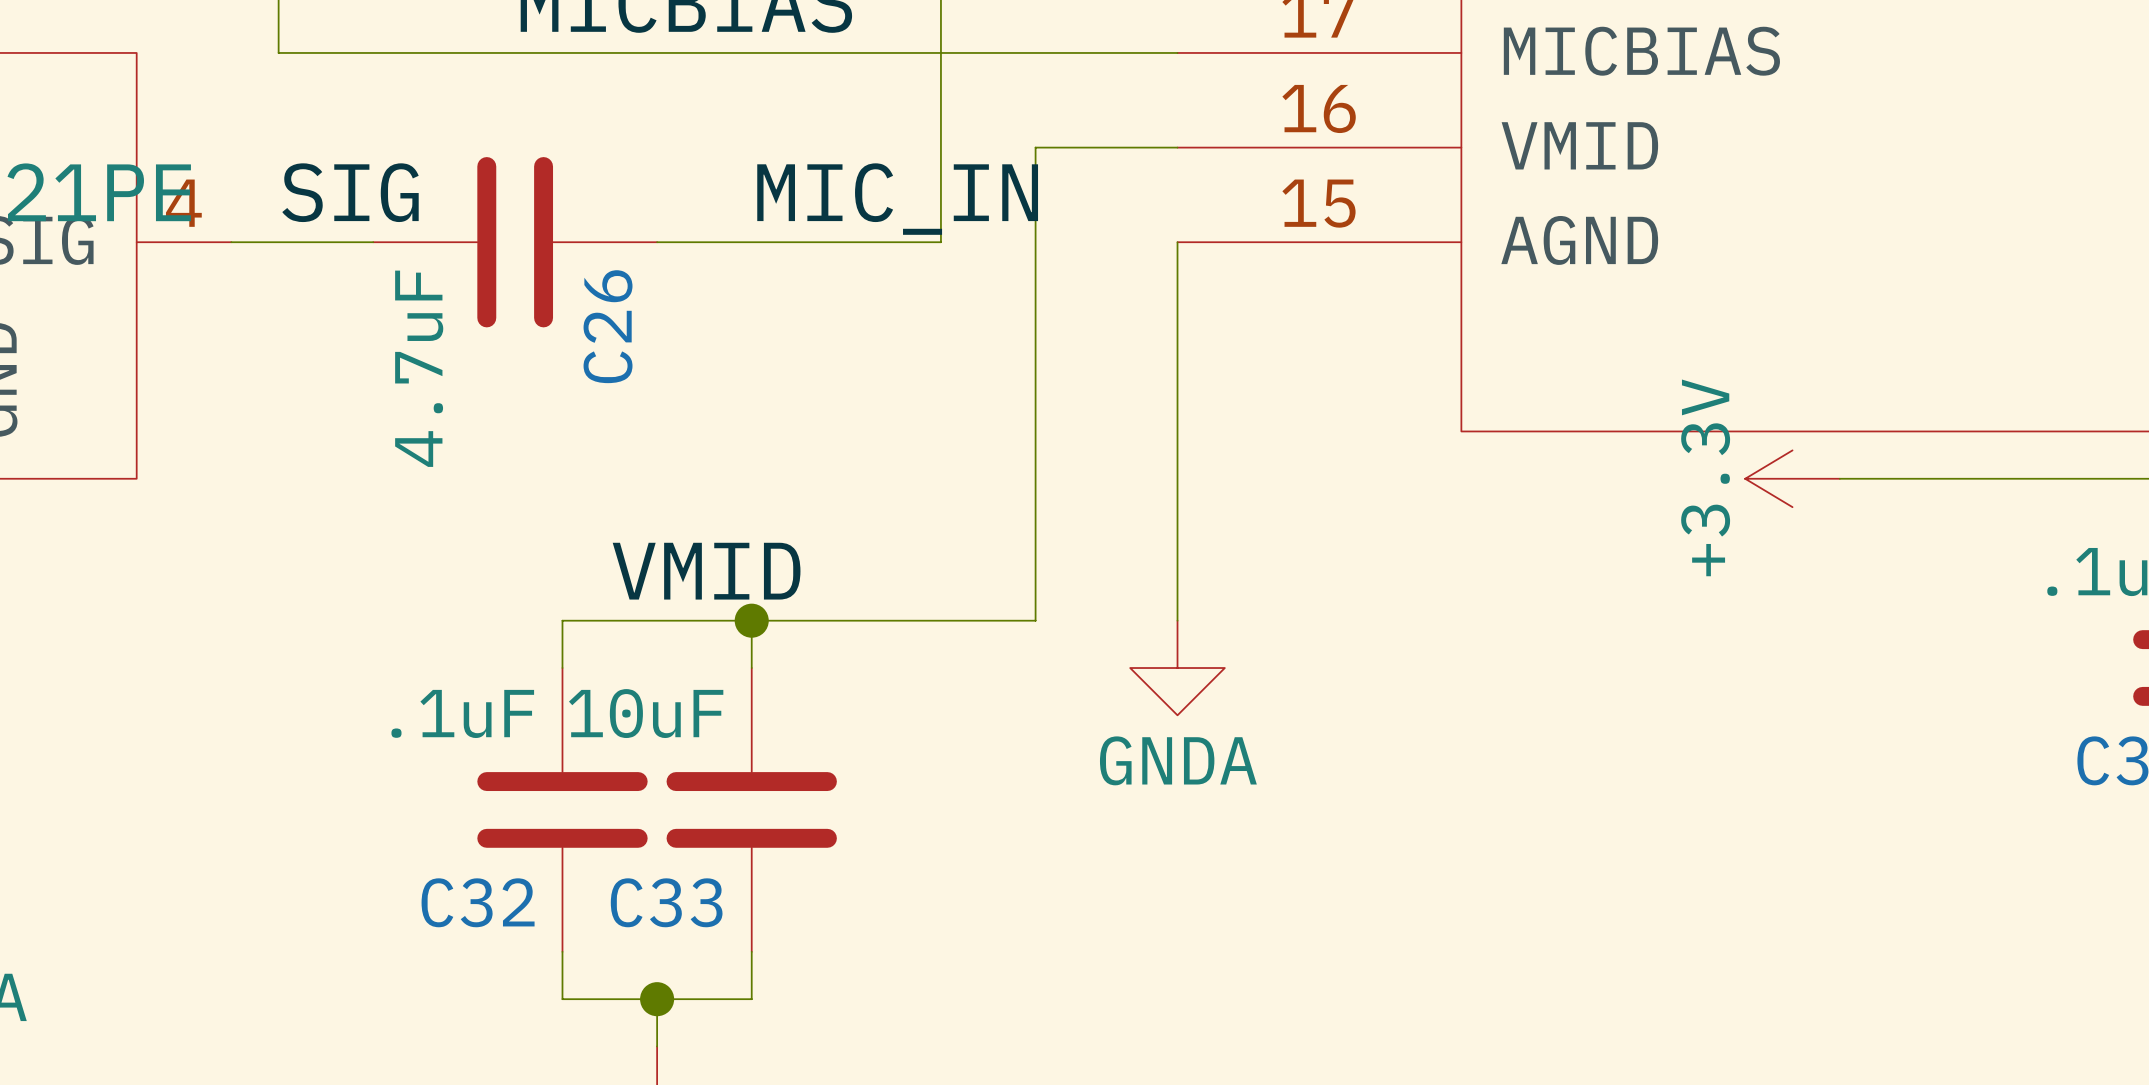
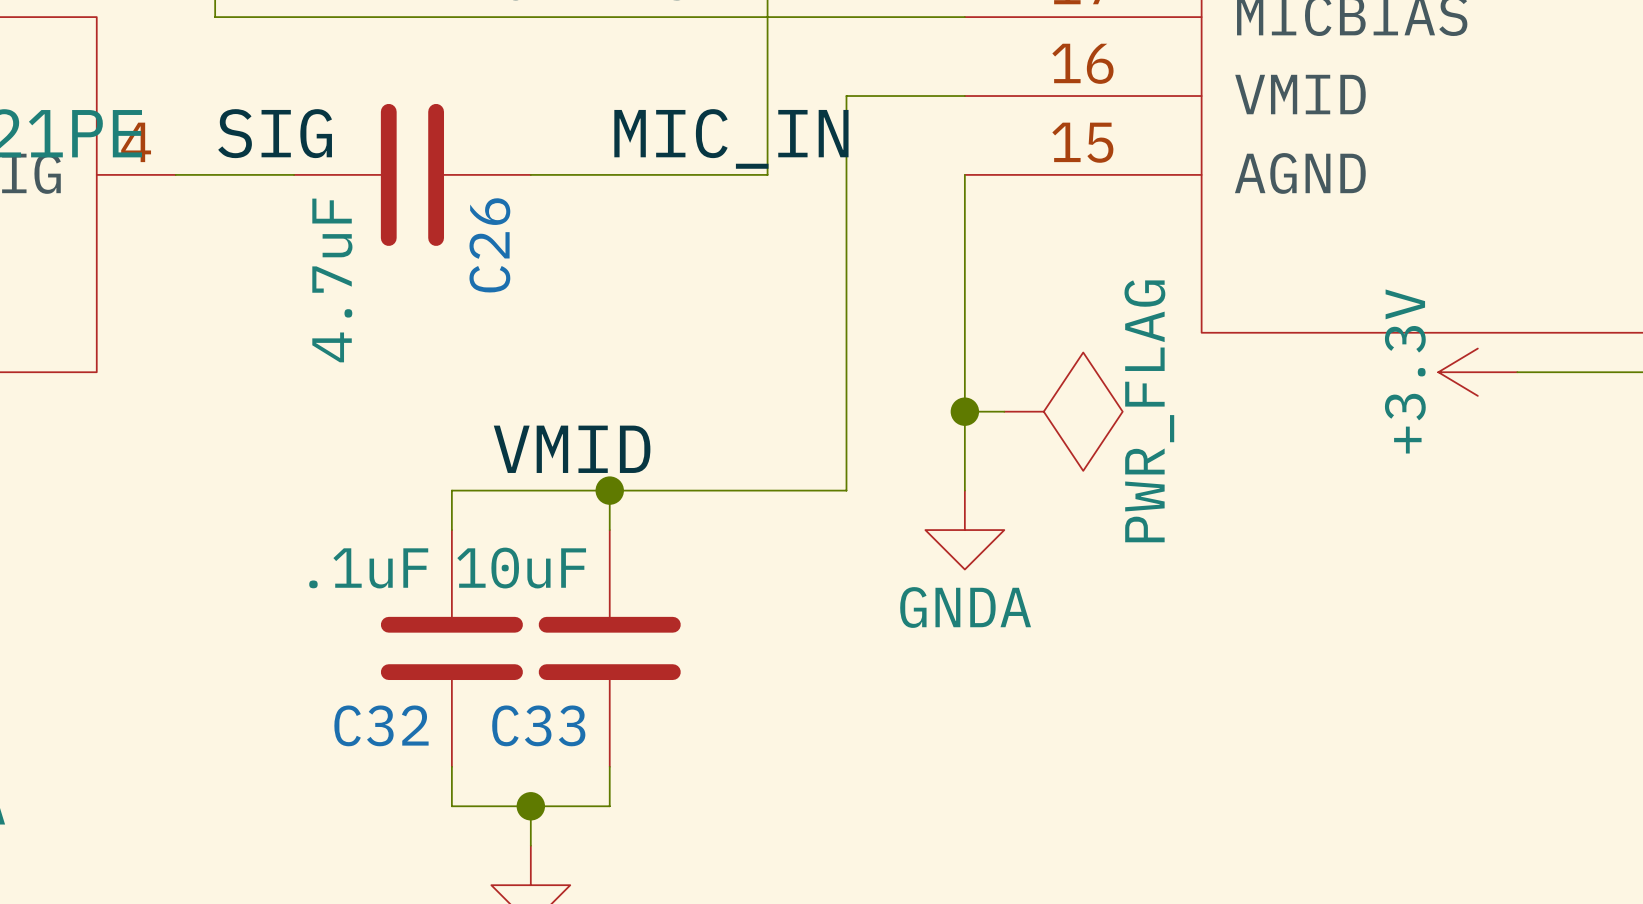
wire: none -> (964, 411) (1004, 411)
junction: none -> (964, 411)
power symbol: none -> PWR_FLAG (1063, 411)

